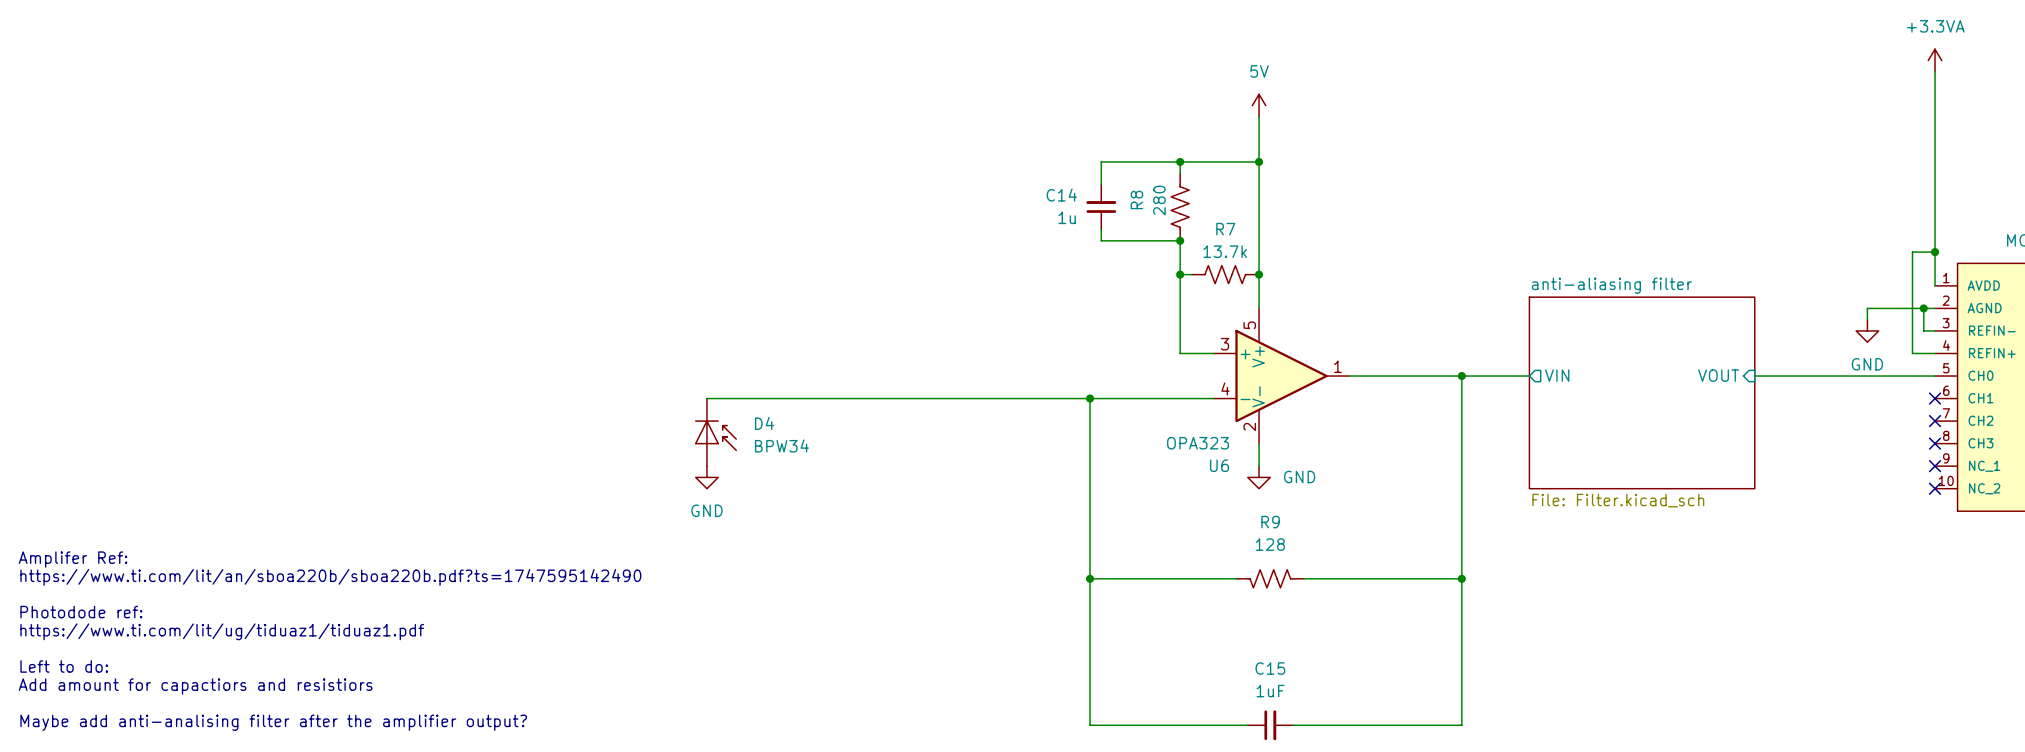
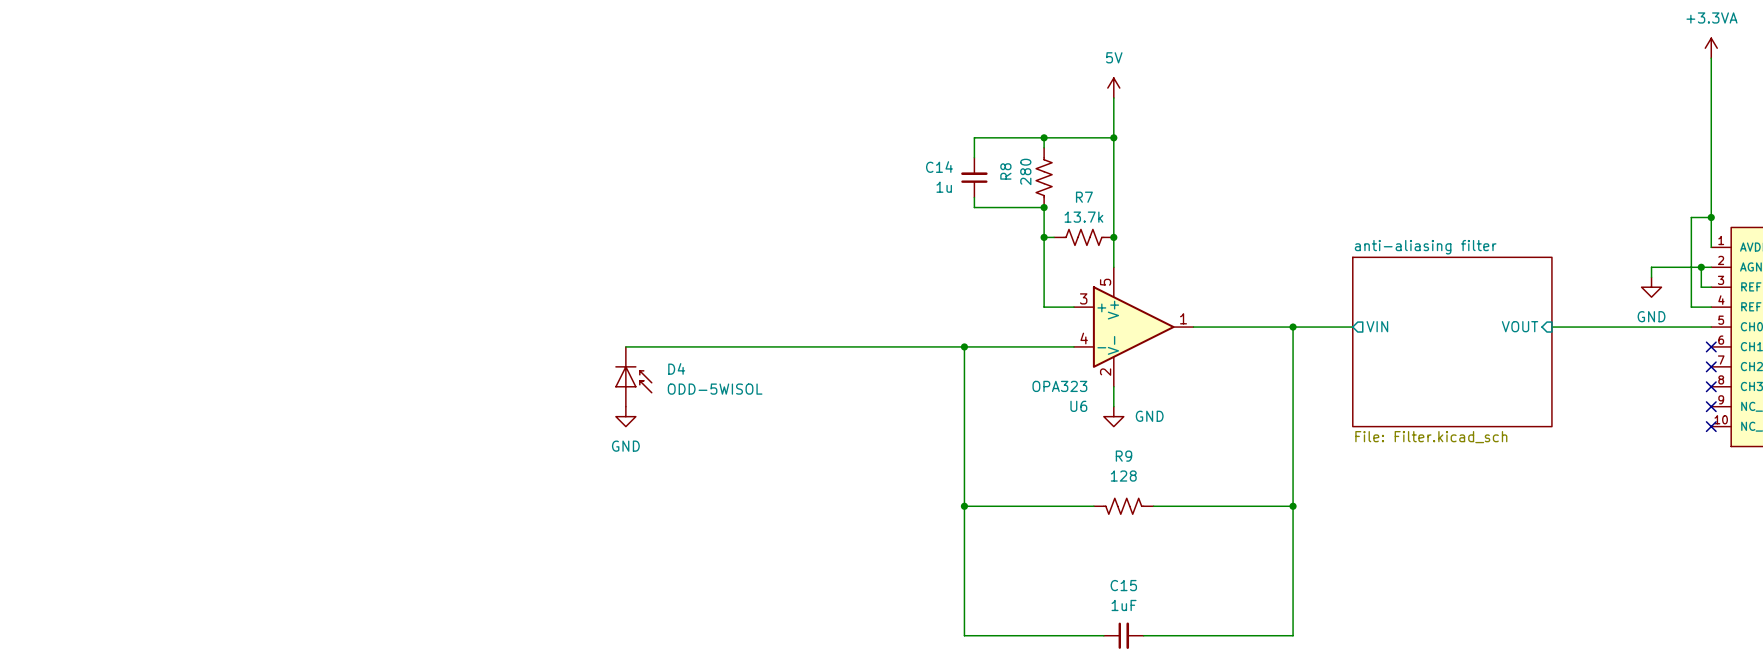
D4 value: BPW34 (781, 445) -> ODD-5WISOL (715, 389)
text: Amplifer Ref: (73, 559) -> none
text: https://www.ti.com/lit/an/sboa220b/sboa220b.pdf?ts=1747595142490 (330, 577) -> none
text: Photodode ref: (81, 612) -> none
text: https://www.ti.com/lit/ug/tiduaz1/tiduaz1.pdf (222, 631) -> none
text: Left to do: (64, 666) -> none
text: Add amount for capactiors and resistiors (195, 686) -> none
text: Maybe add anti-analising filter after the amplifier output? (273, 722) -> none

